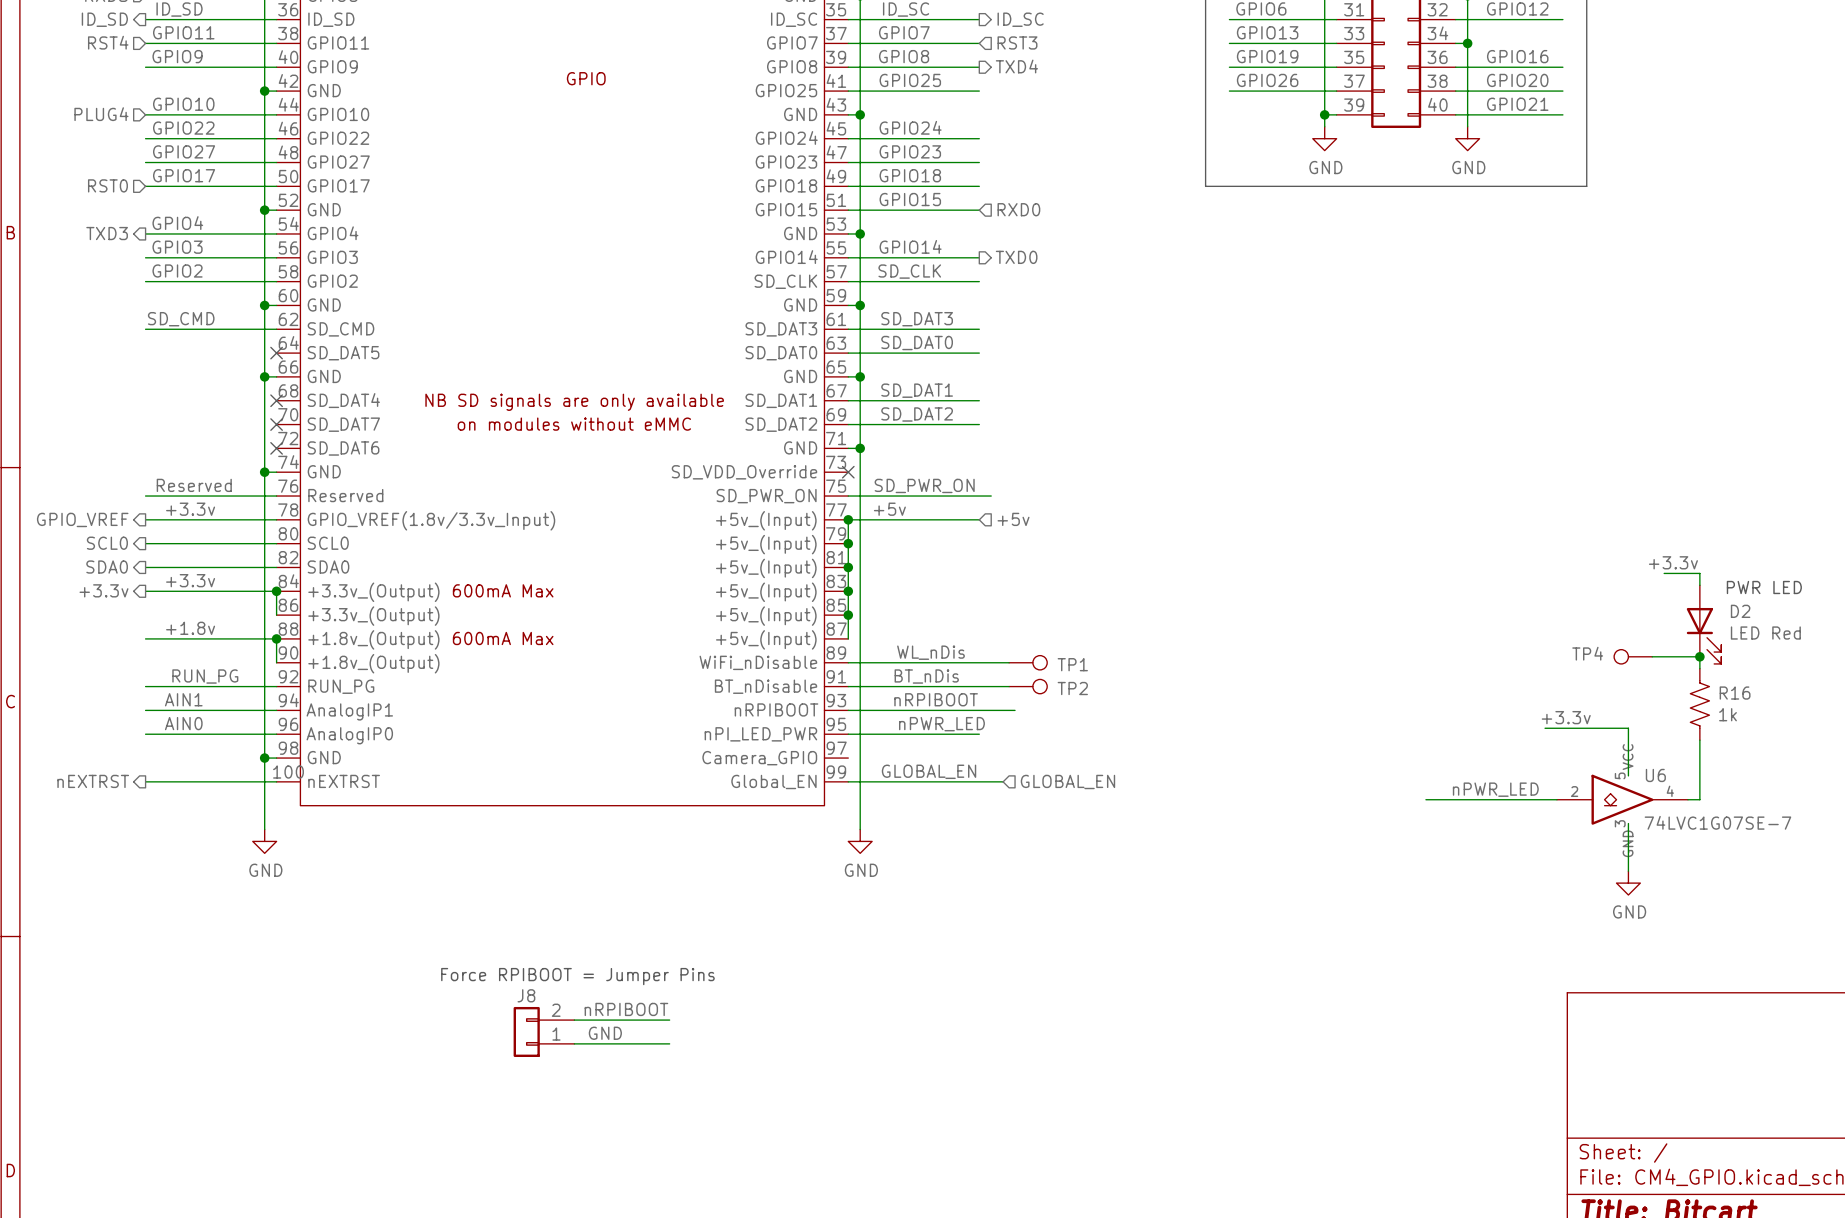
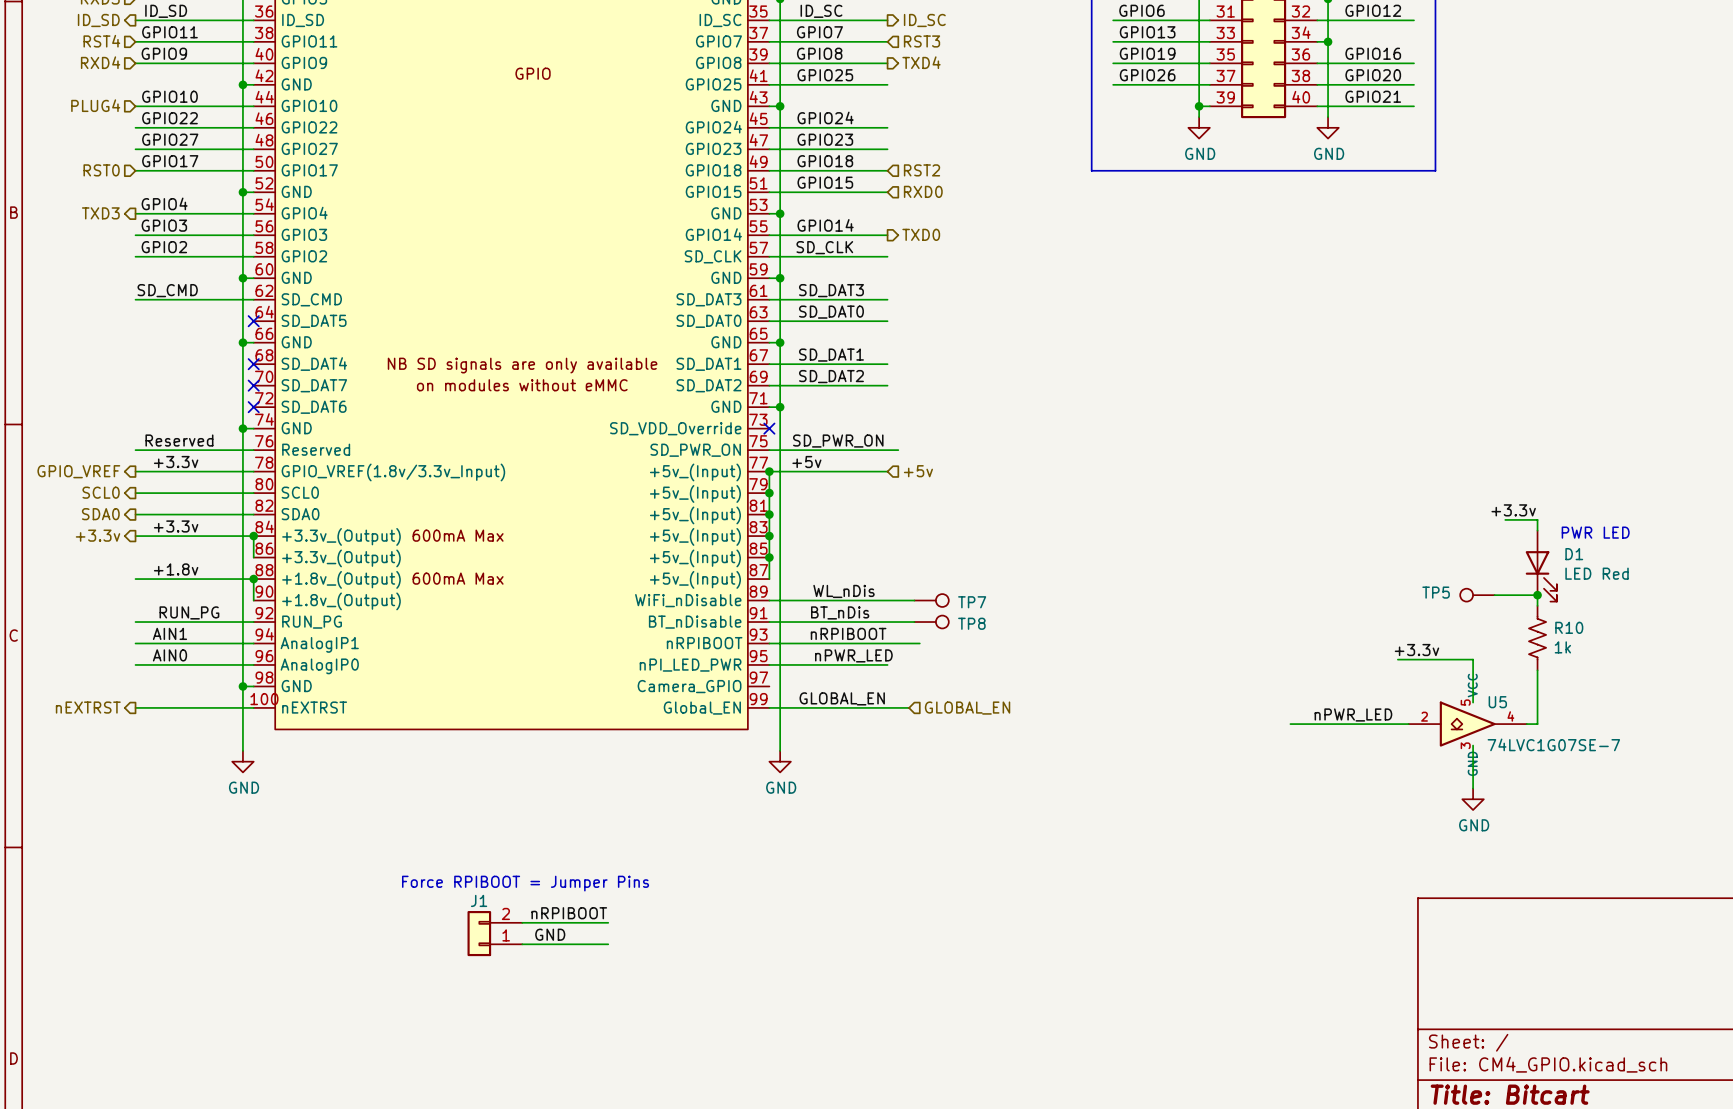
hierarchical label: none -> RXD4 (100, 62)
hierarchical label: none -> RST2 (922, 170)
D2 name: D2 (1740, 611) -> D1 (1574, 554)
TP4 name: TP4 (1587, 653) -> TP5 (1436, 592)
TP1 name: TP1 (1072, 664) -> TP7 (972, 602)
TP2 name: TP2 (1072, 688) -> TP8 (971, 623)
R16 name: R16 (1735, 693) -> R10 (1569, 627)
U6 name: U6 (1655, 775) -> U5 (1497, 702)
J8 name: J8 (526, 995) -> J1 (479, 900)

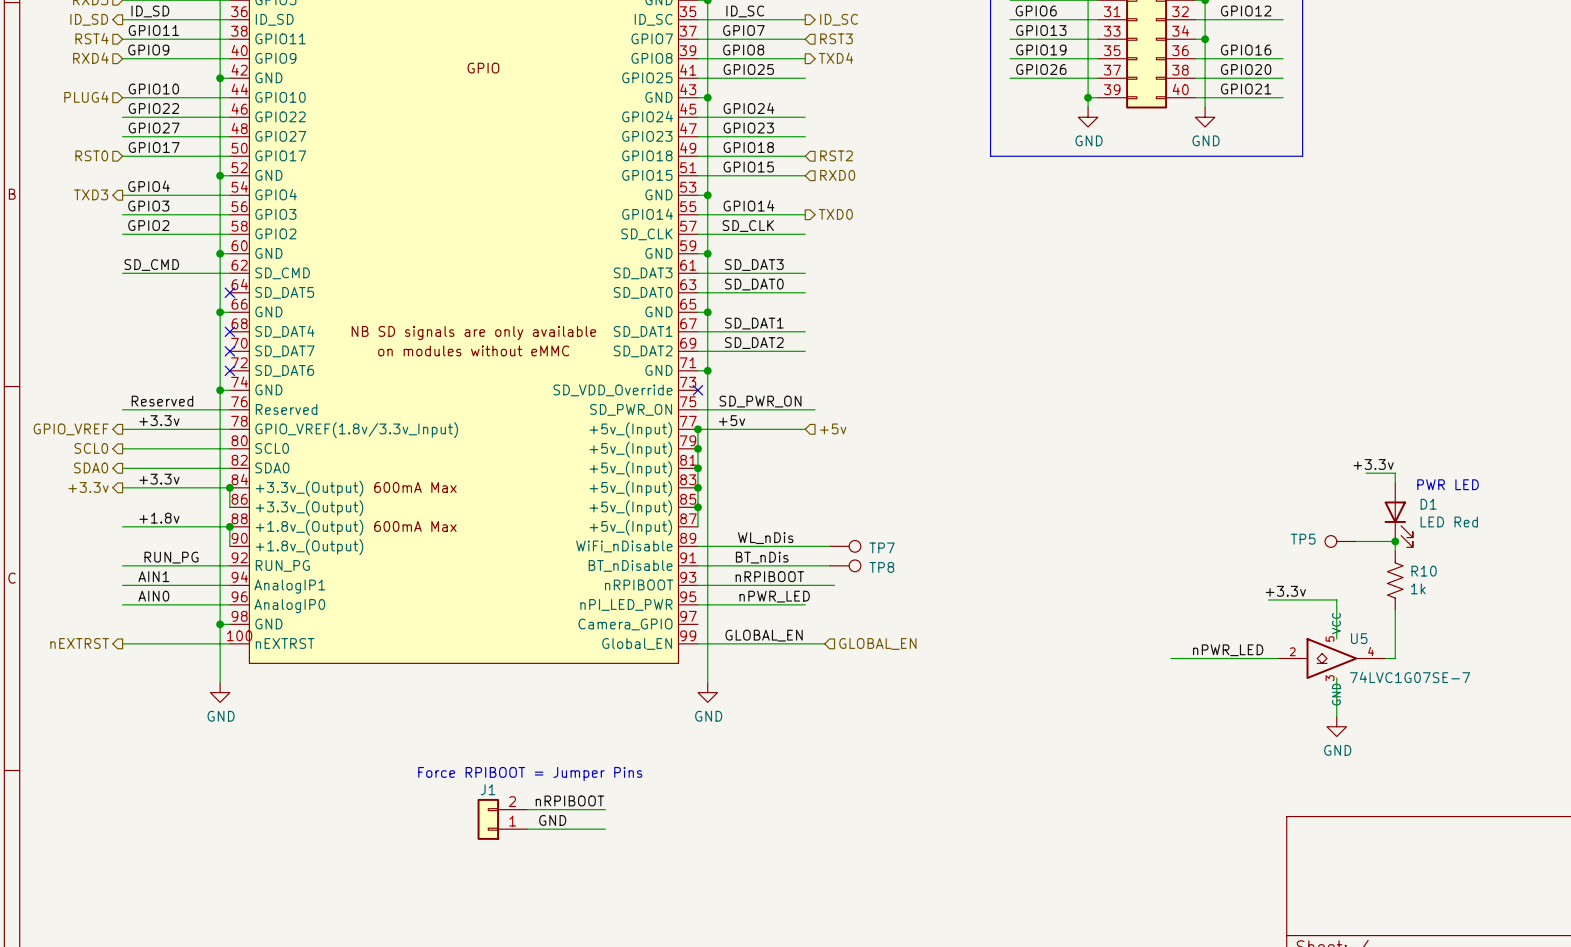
U5 symbol: [1408, 701, 1527, 747] -> [1278, 638, 1386, 679]
text position: Force RPIBOOT = Jumper Pins (525, 883) -> Force RPIBOOT = Jumper Pins (530, 774)
label position: nRPIBOOT (569, 913) -> nRPIBOOT (569, 800)
wire: (522, 922) (608, 922) -> (527, 829) (605, 829)
J1 position: (494, 933) -> (502, 819)
label position: GND (550, 934) -> GND (552, 820)
wire: (522, 944) (608, 944) -> (527, 809) (605, 809)

